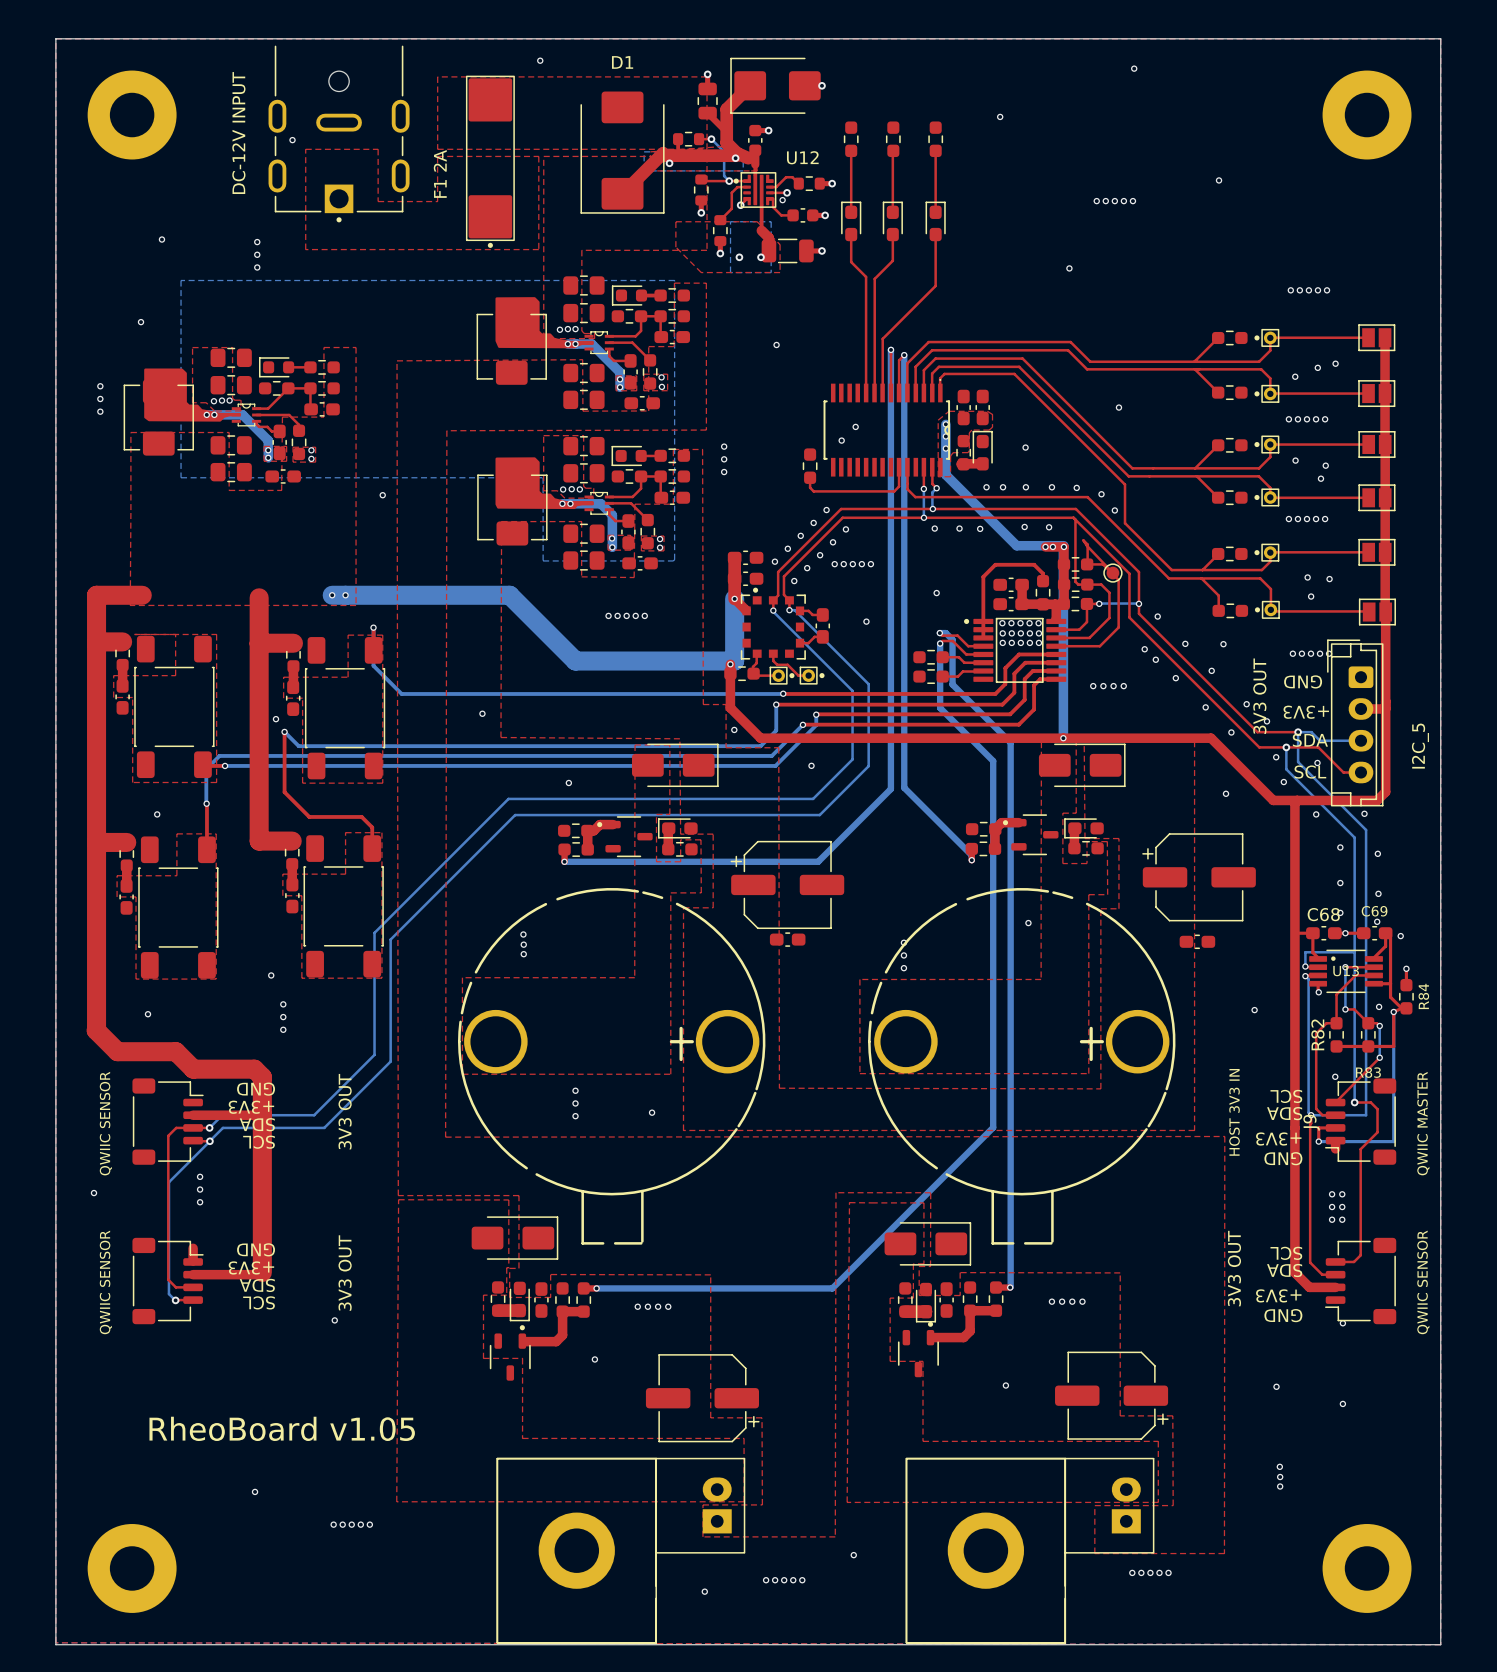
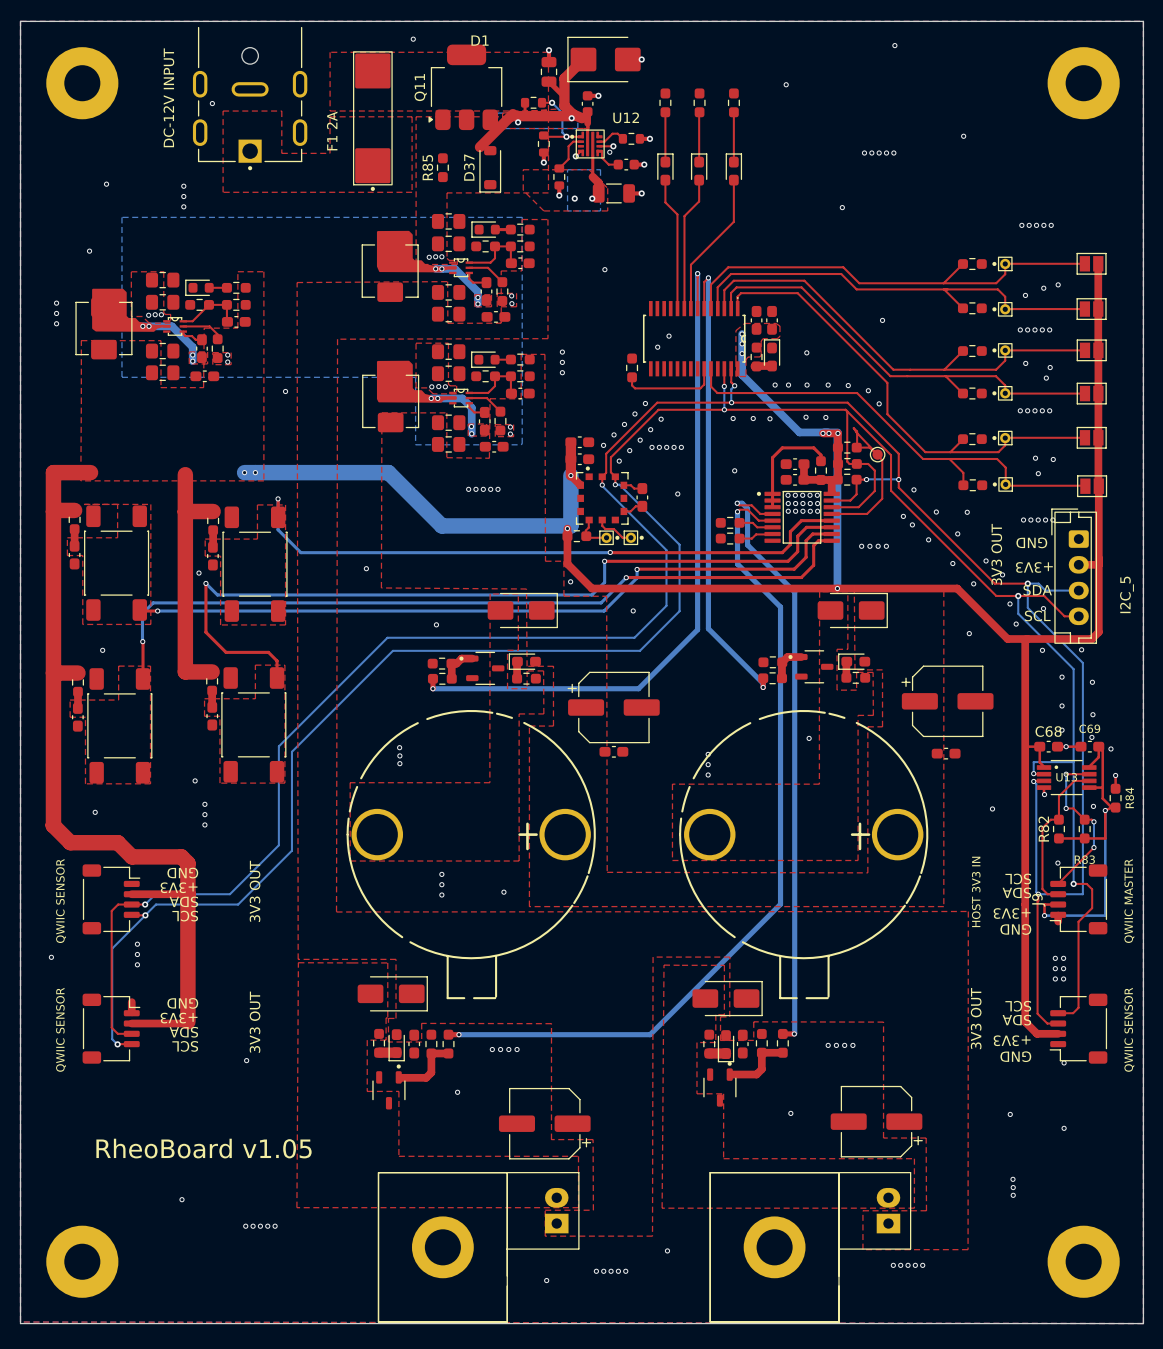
Q11: none -> (465, 87)
part: (622, 152) -> none
R85: none -> (442, 167)
D37: none -> (490, 169)

